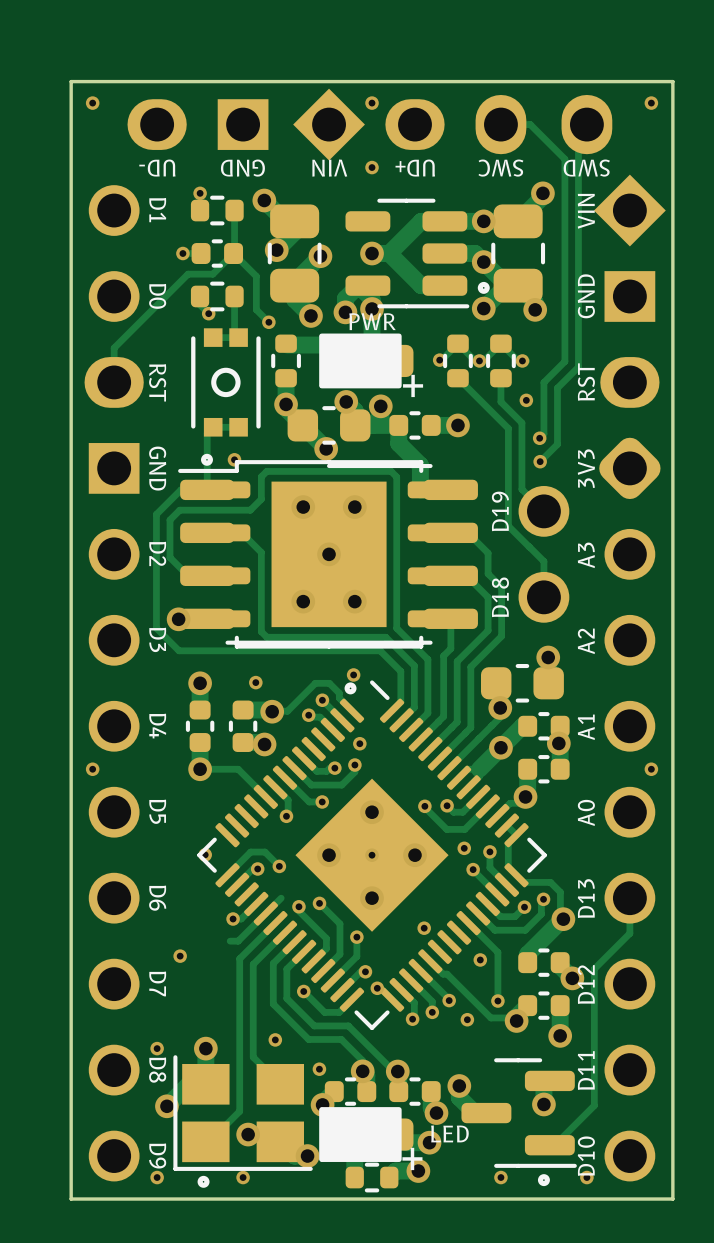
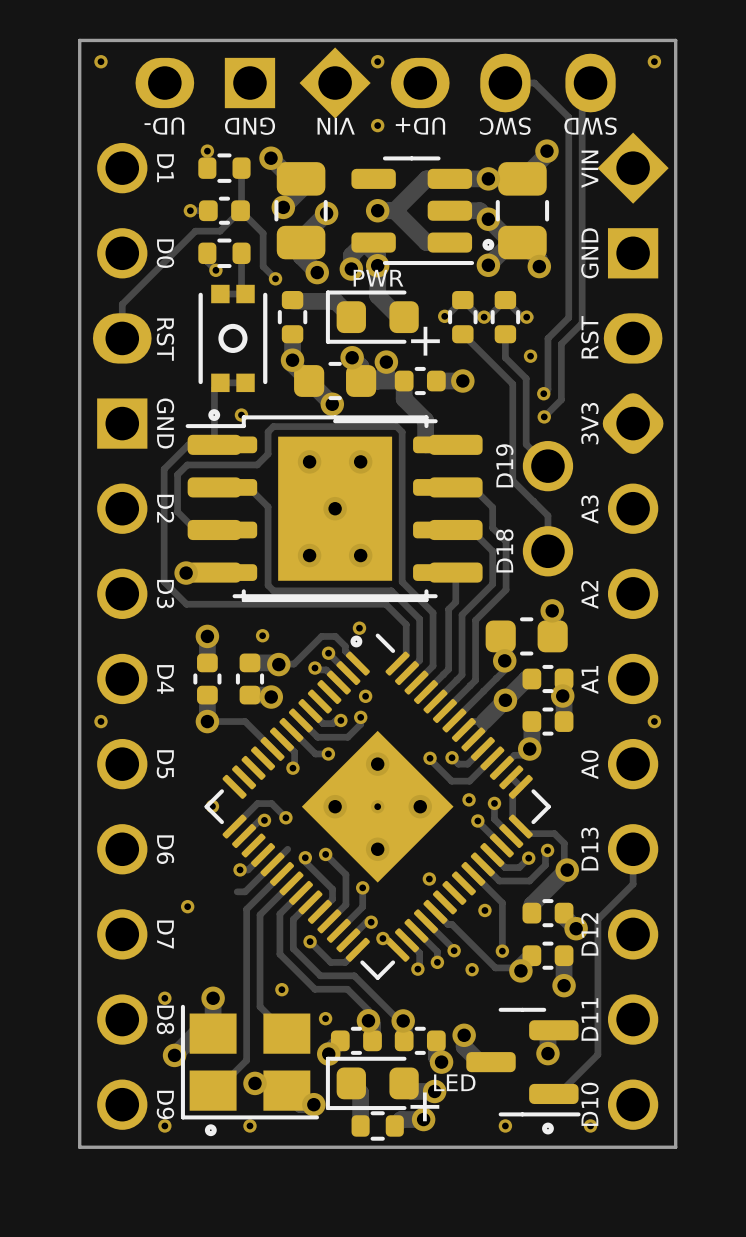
drawing: [319, 333, 402, 389] -> none
drawing: [319, 1107, 402, 1162] -> none

